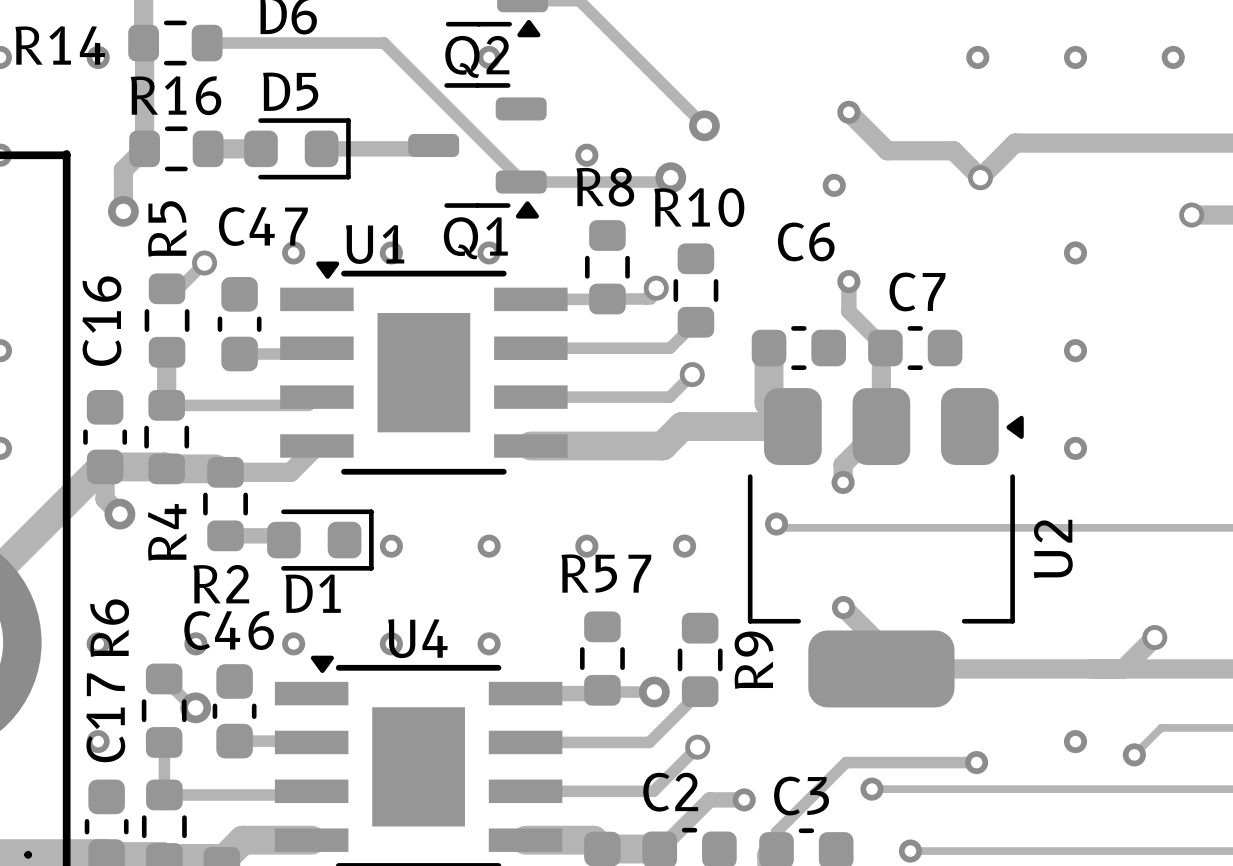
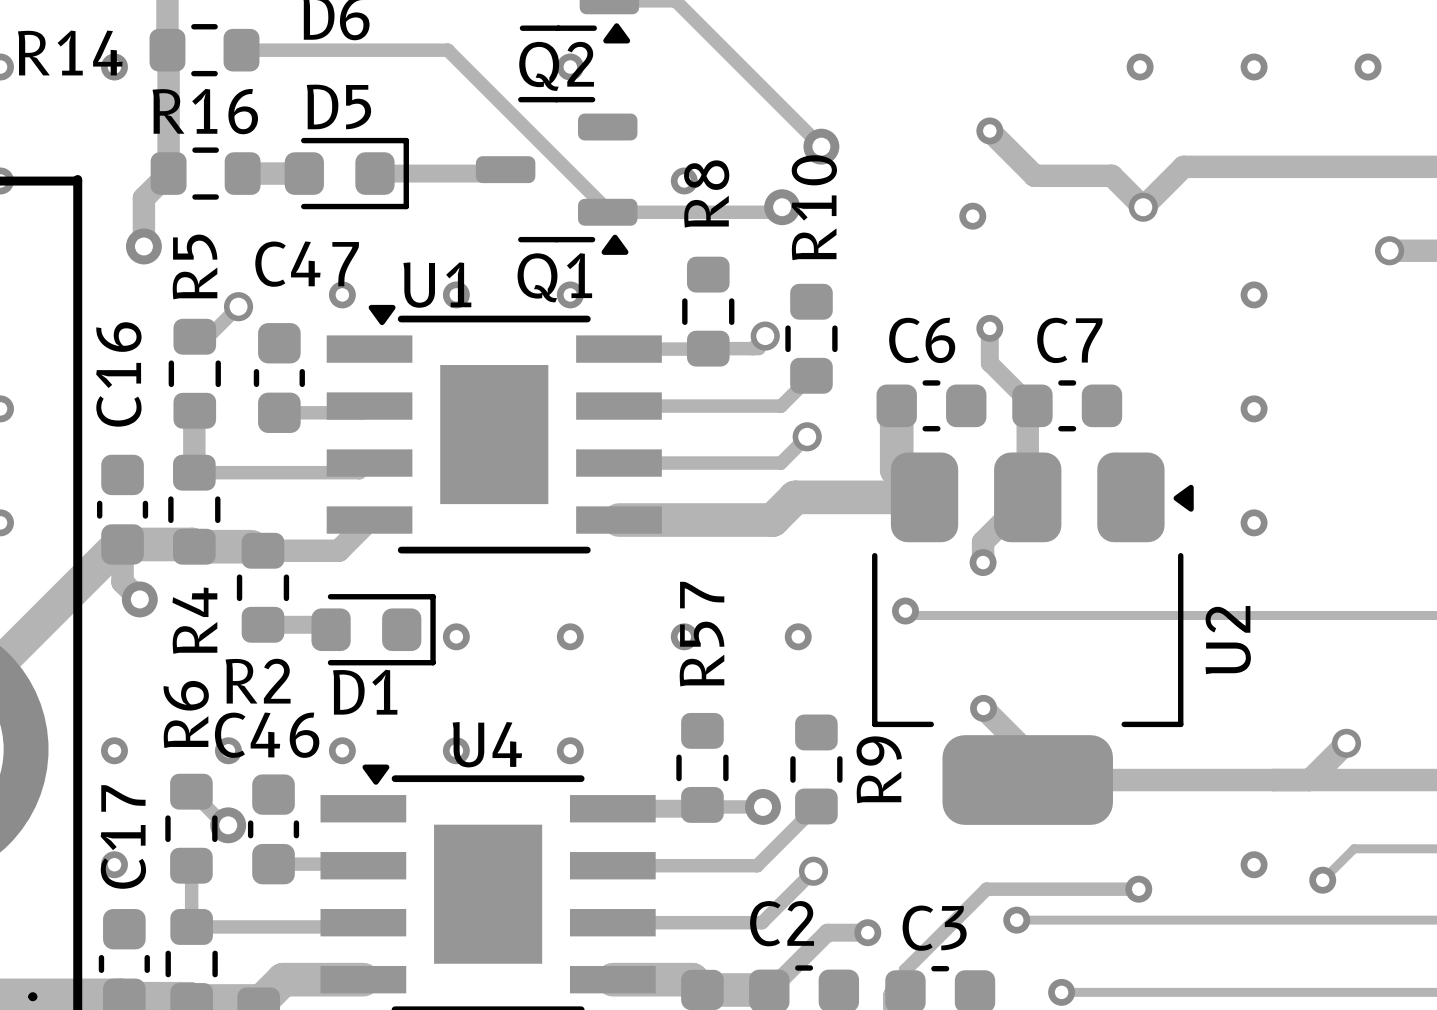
R8 name rotation: 0° (605, 187) -> 90° counterclockwise (706, 193)
R10 name rotation: 0° (699, 207) -> 90° counterclockwise (814, 207)
C6 name position: C6 (806, 241) -> C6 (922, 340)
R57 name rotation: 0° (606, 573) -> 90° counterclockwise (702, 634)
R6 name position: R6 (109, 628) -> R6 (186, 714)

